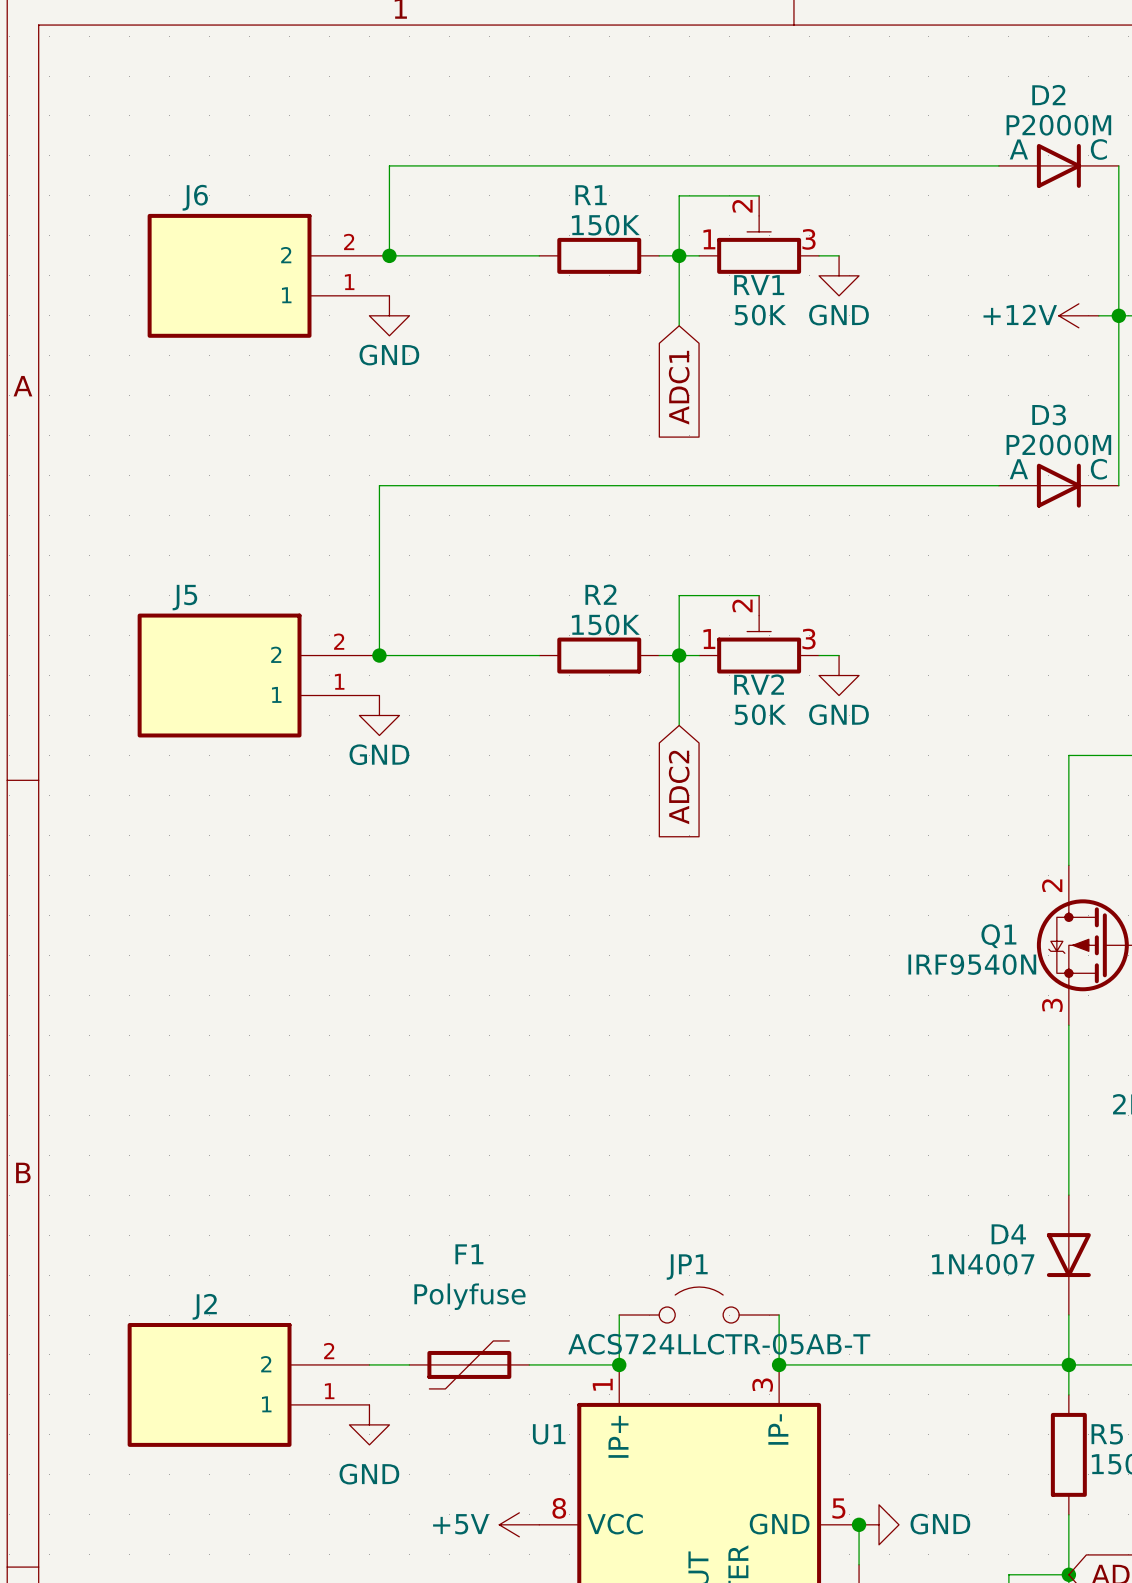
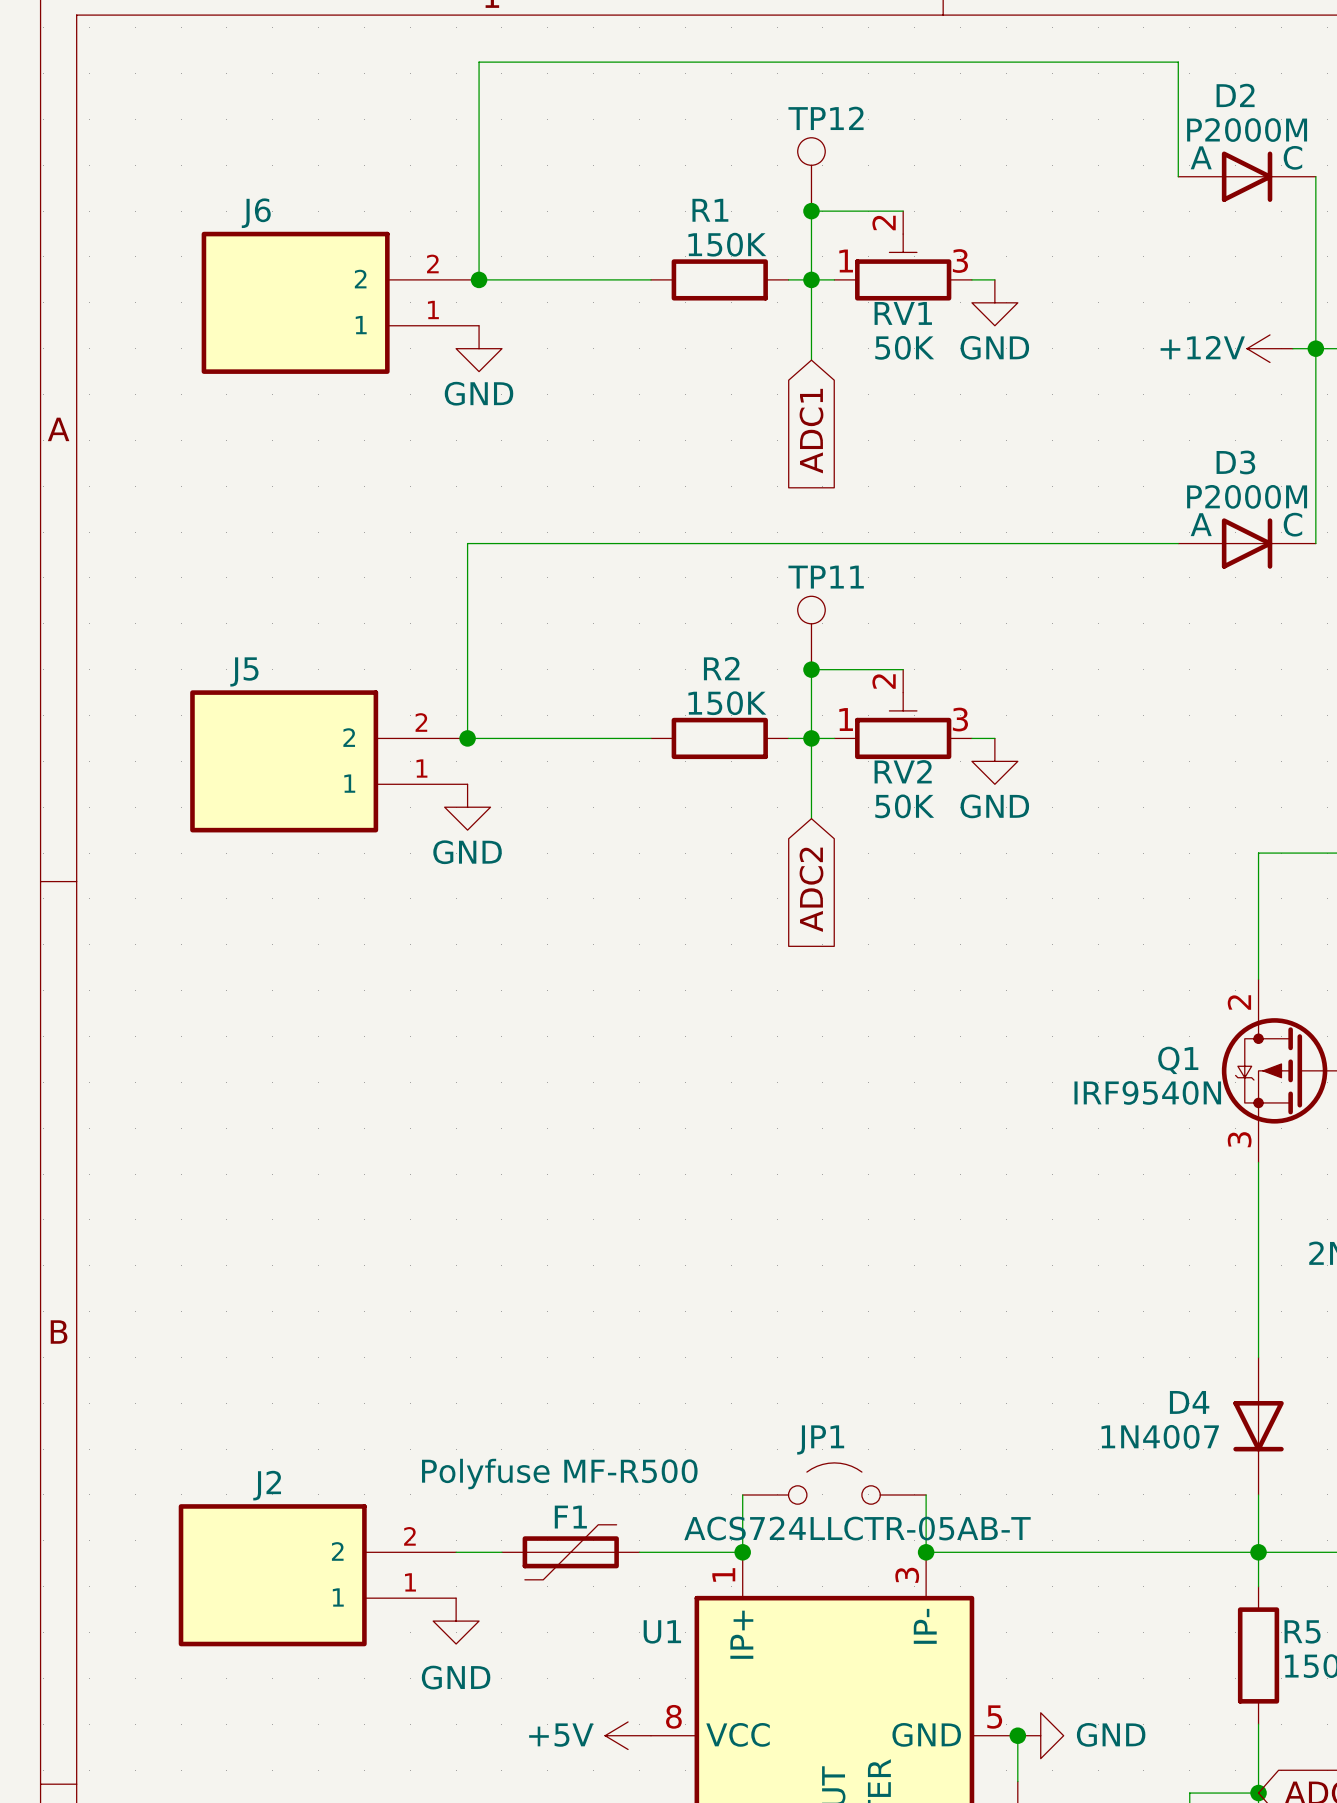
TP12: none -> (811, 174)
wire: (389, 165) (998, 165) -> (479, 176) (479, 62) (1178, 62) (1178, 176)
junction: none -> (811, 211)
TP11: none -> (811, 632)
junction: none -> (811, 669)
F1 name position: F1 (469, 1254) -> F1 (570, 1517)
F1 value: Polyfuse (469, 1296) -> Polyfuse MF-R500 (559, 1474)

